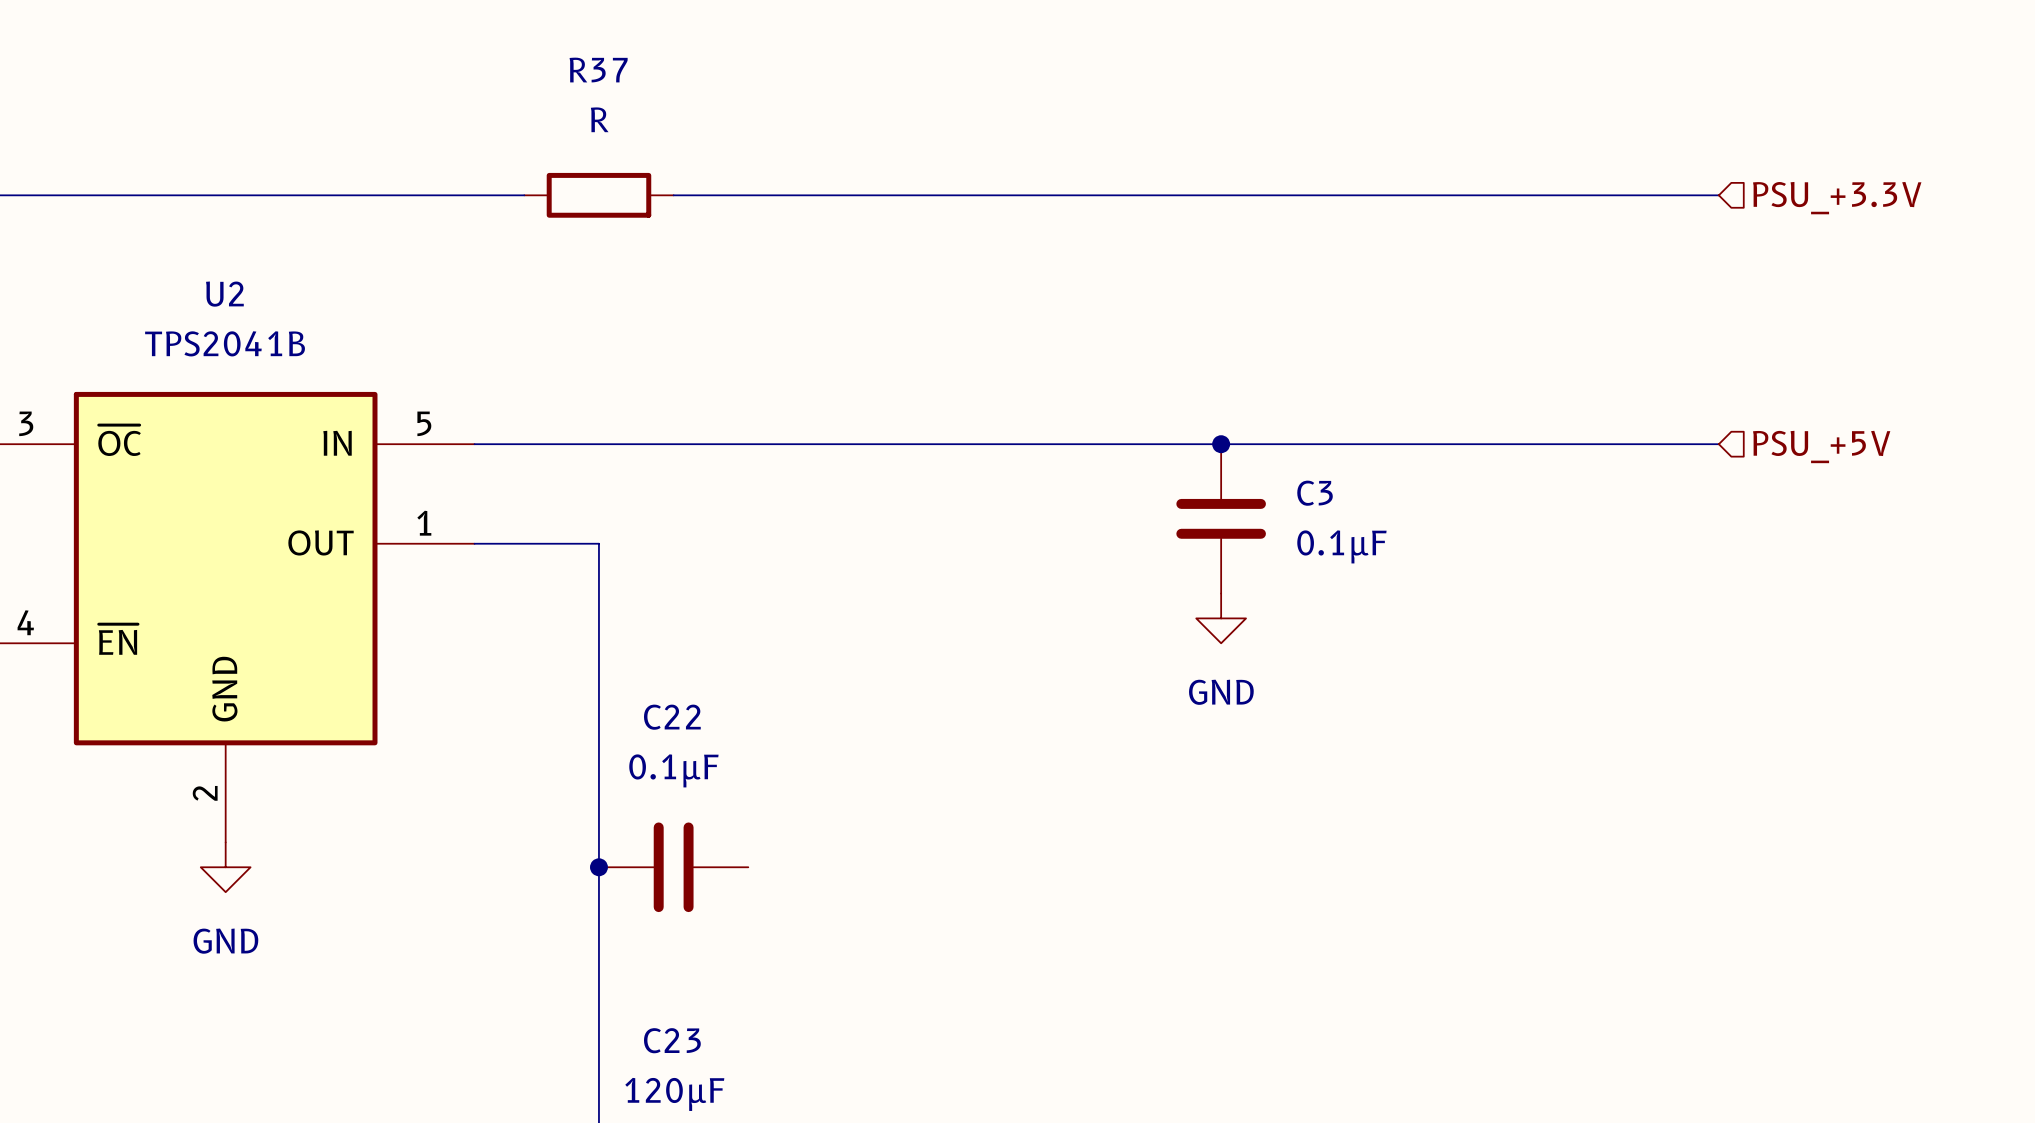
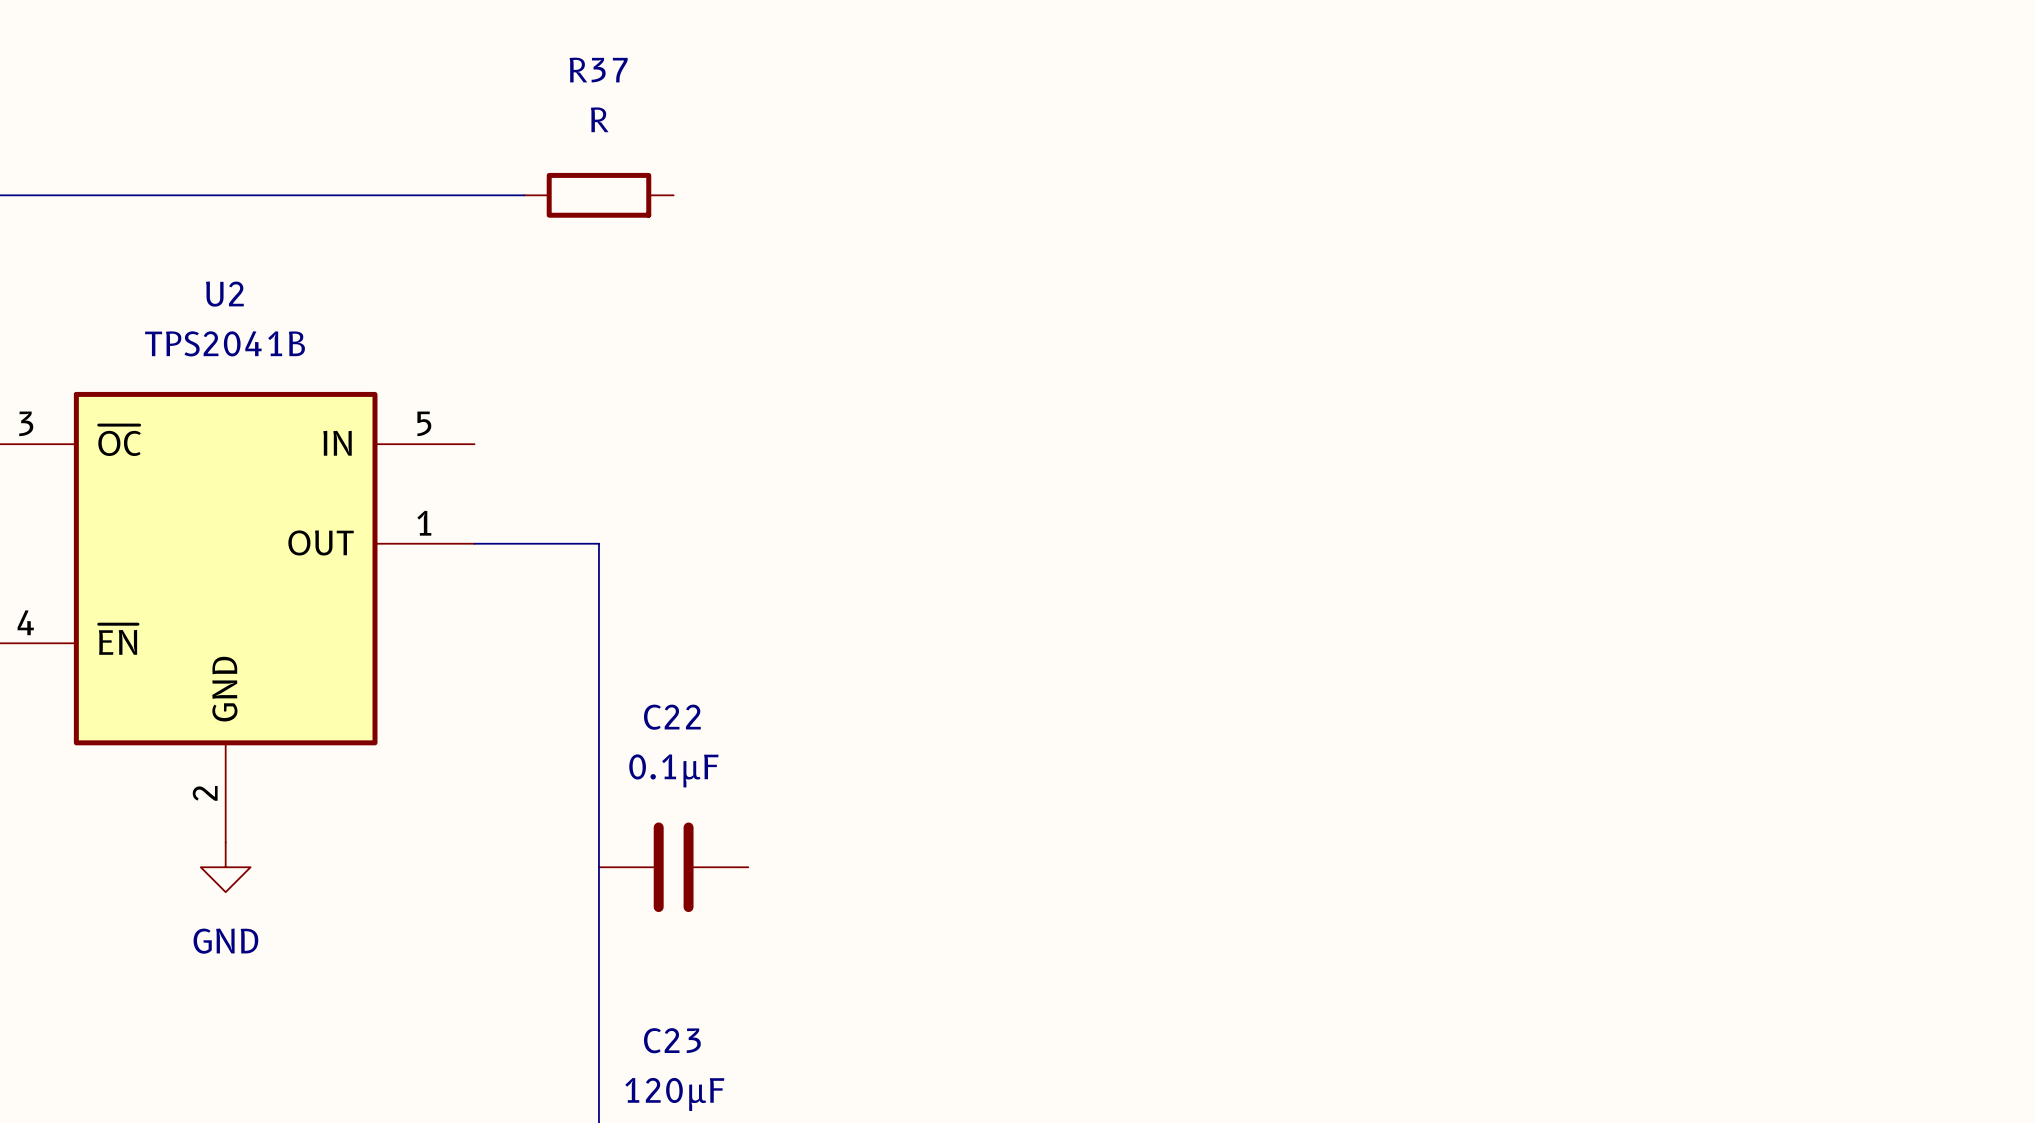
wire: (673, 195) (1718, 195) -> none
hierarchical label: PSU_+3.3V (1837, 198) -> none
wire: (474, 444) (1718, 444) -> none
junction: (1221, 444) -> none
hierarchical label: PSU_+5V (1821, 446) -> none
C3: 0.1µF (1221, 518) -> none
power symbol: GND (1221, 618) -> none
junction: (598, 867) -> none

